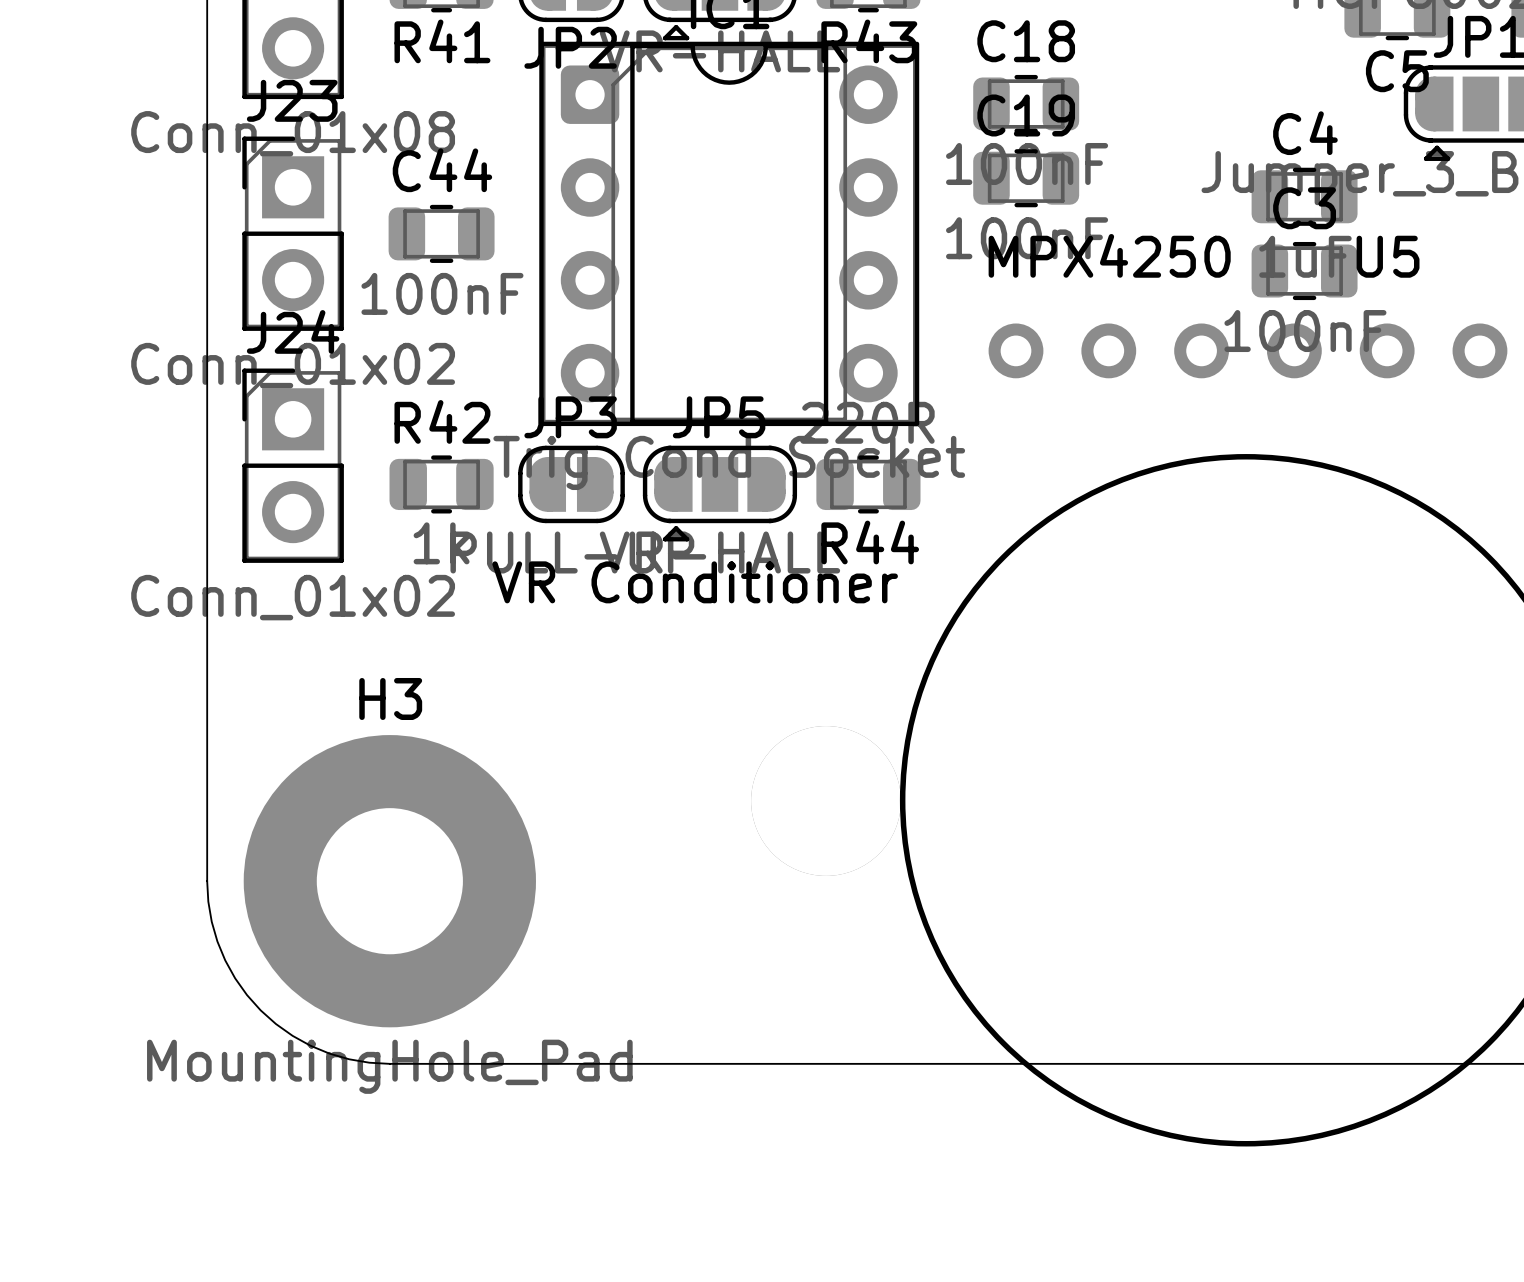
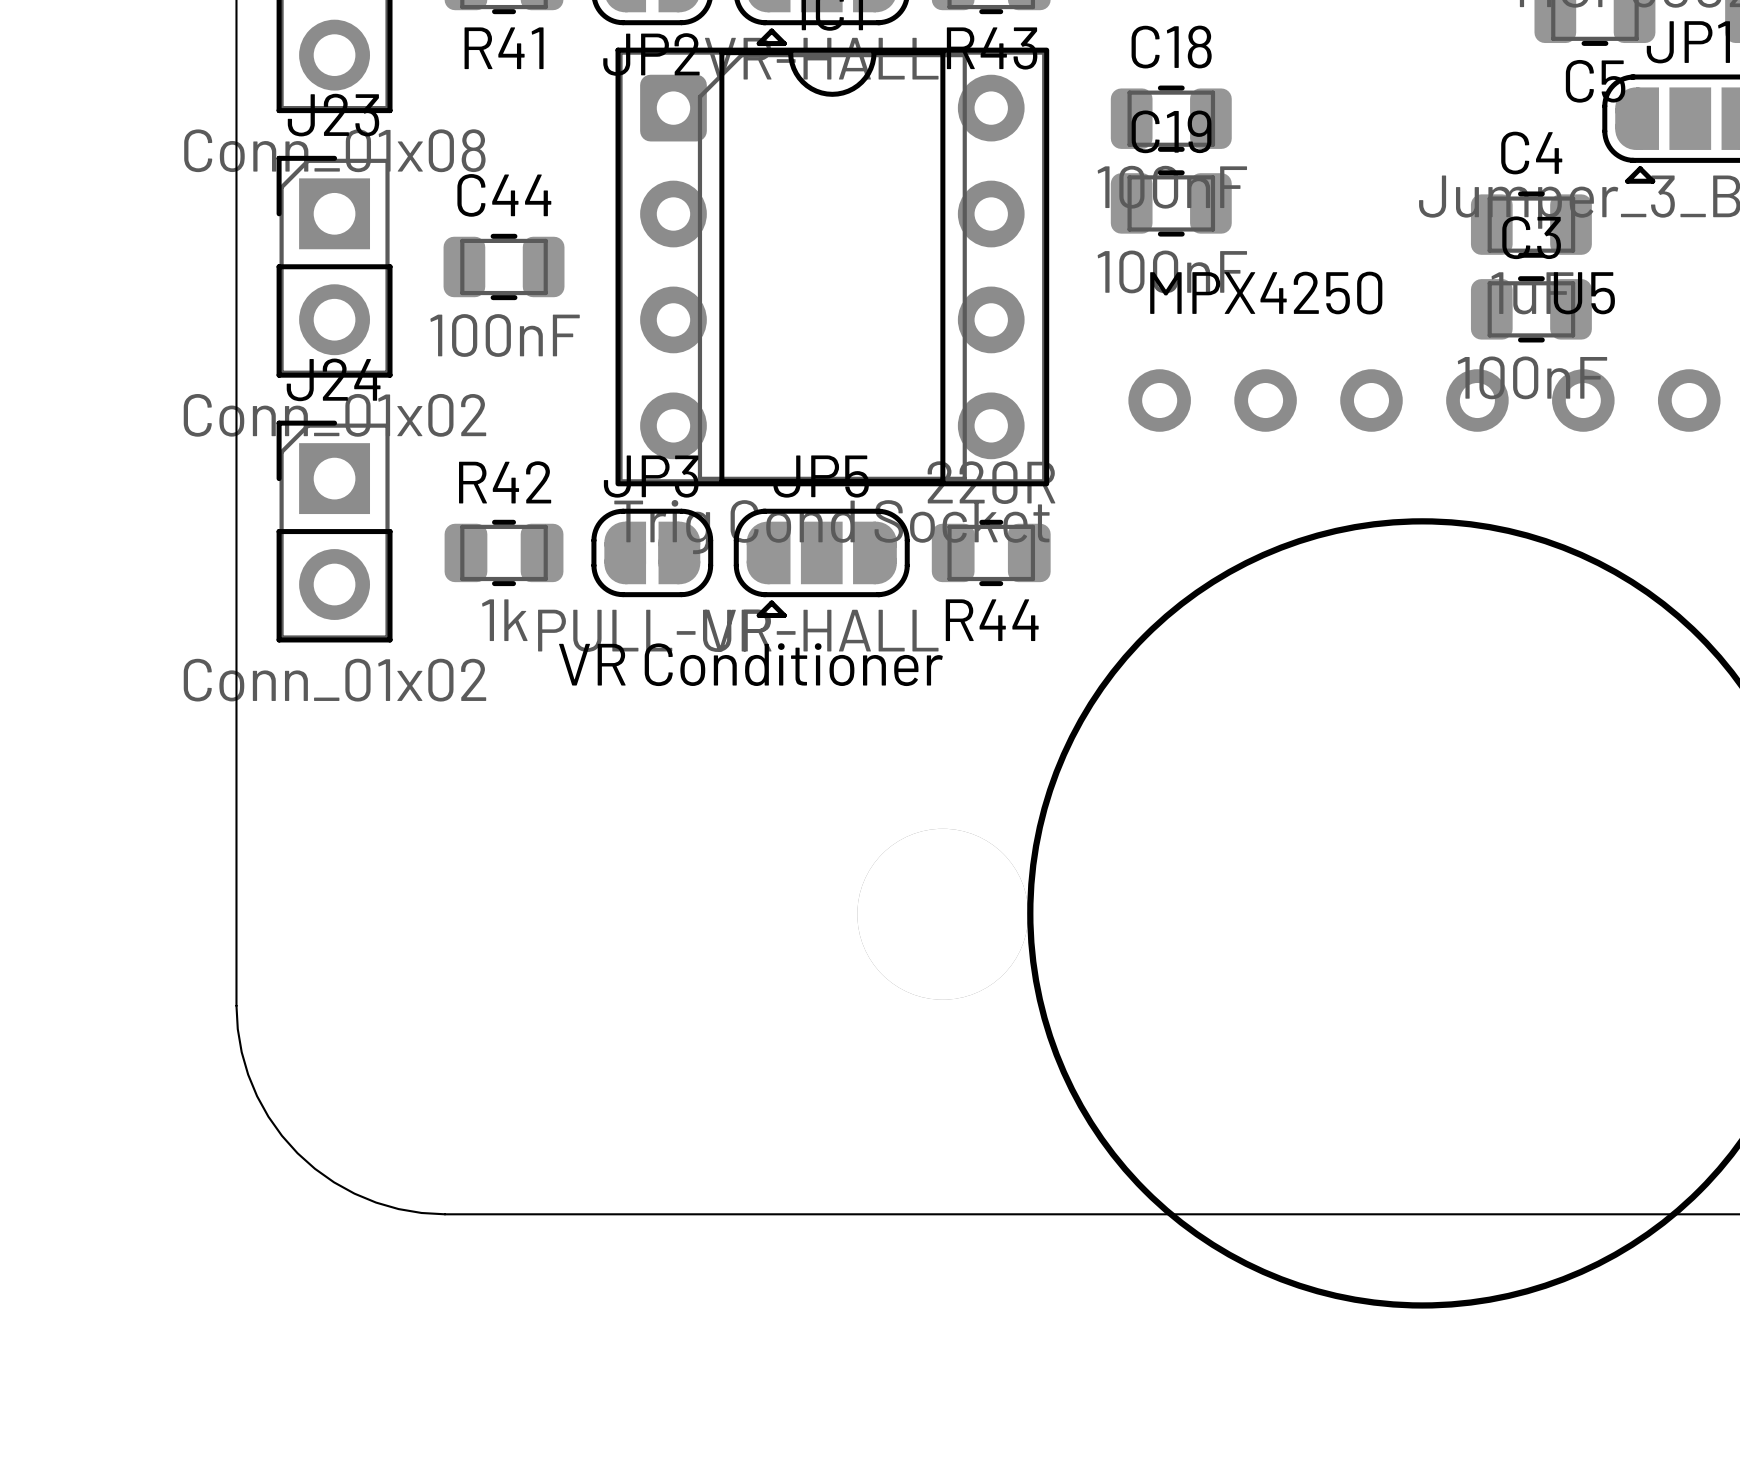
C4 position: (1304, 196) -> (1531, 224)
C3 position: (1304, 271) -> (1531, 309)
H3: MountingHole_Pad (389, 881) -> none

